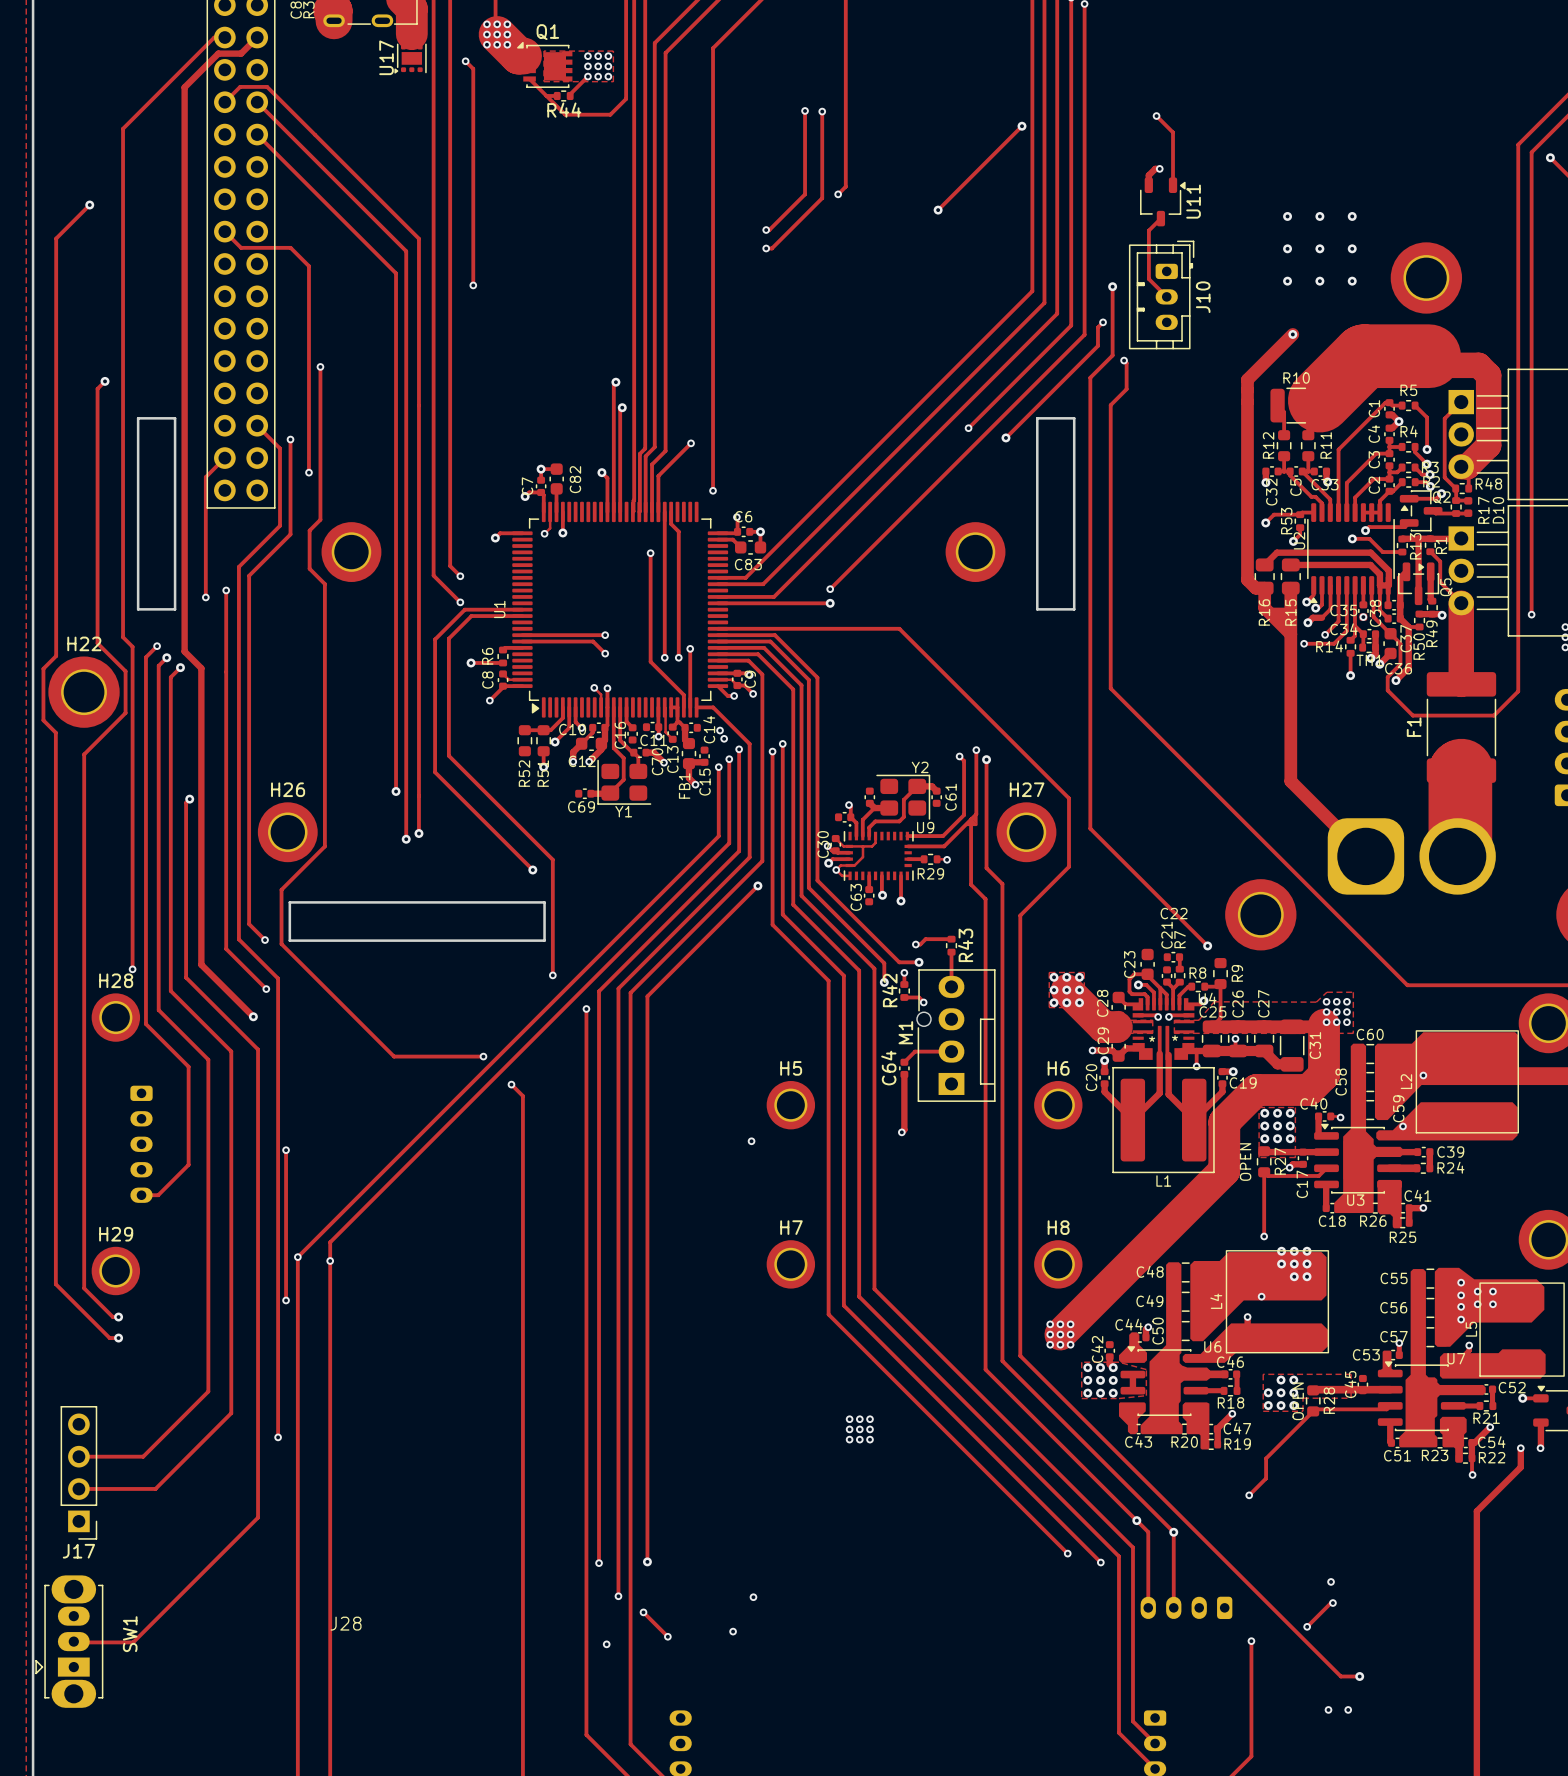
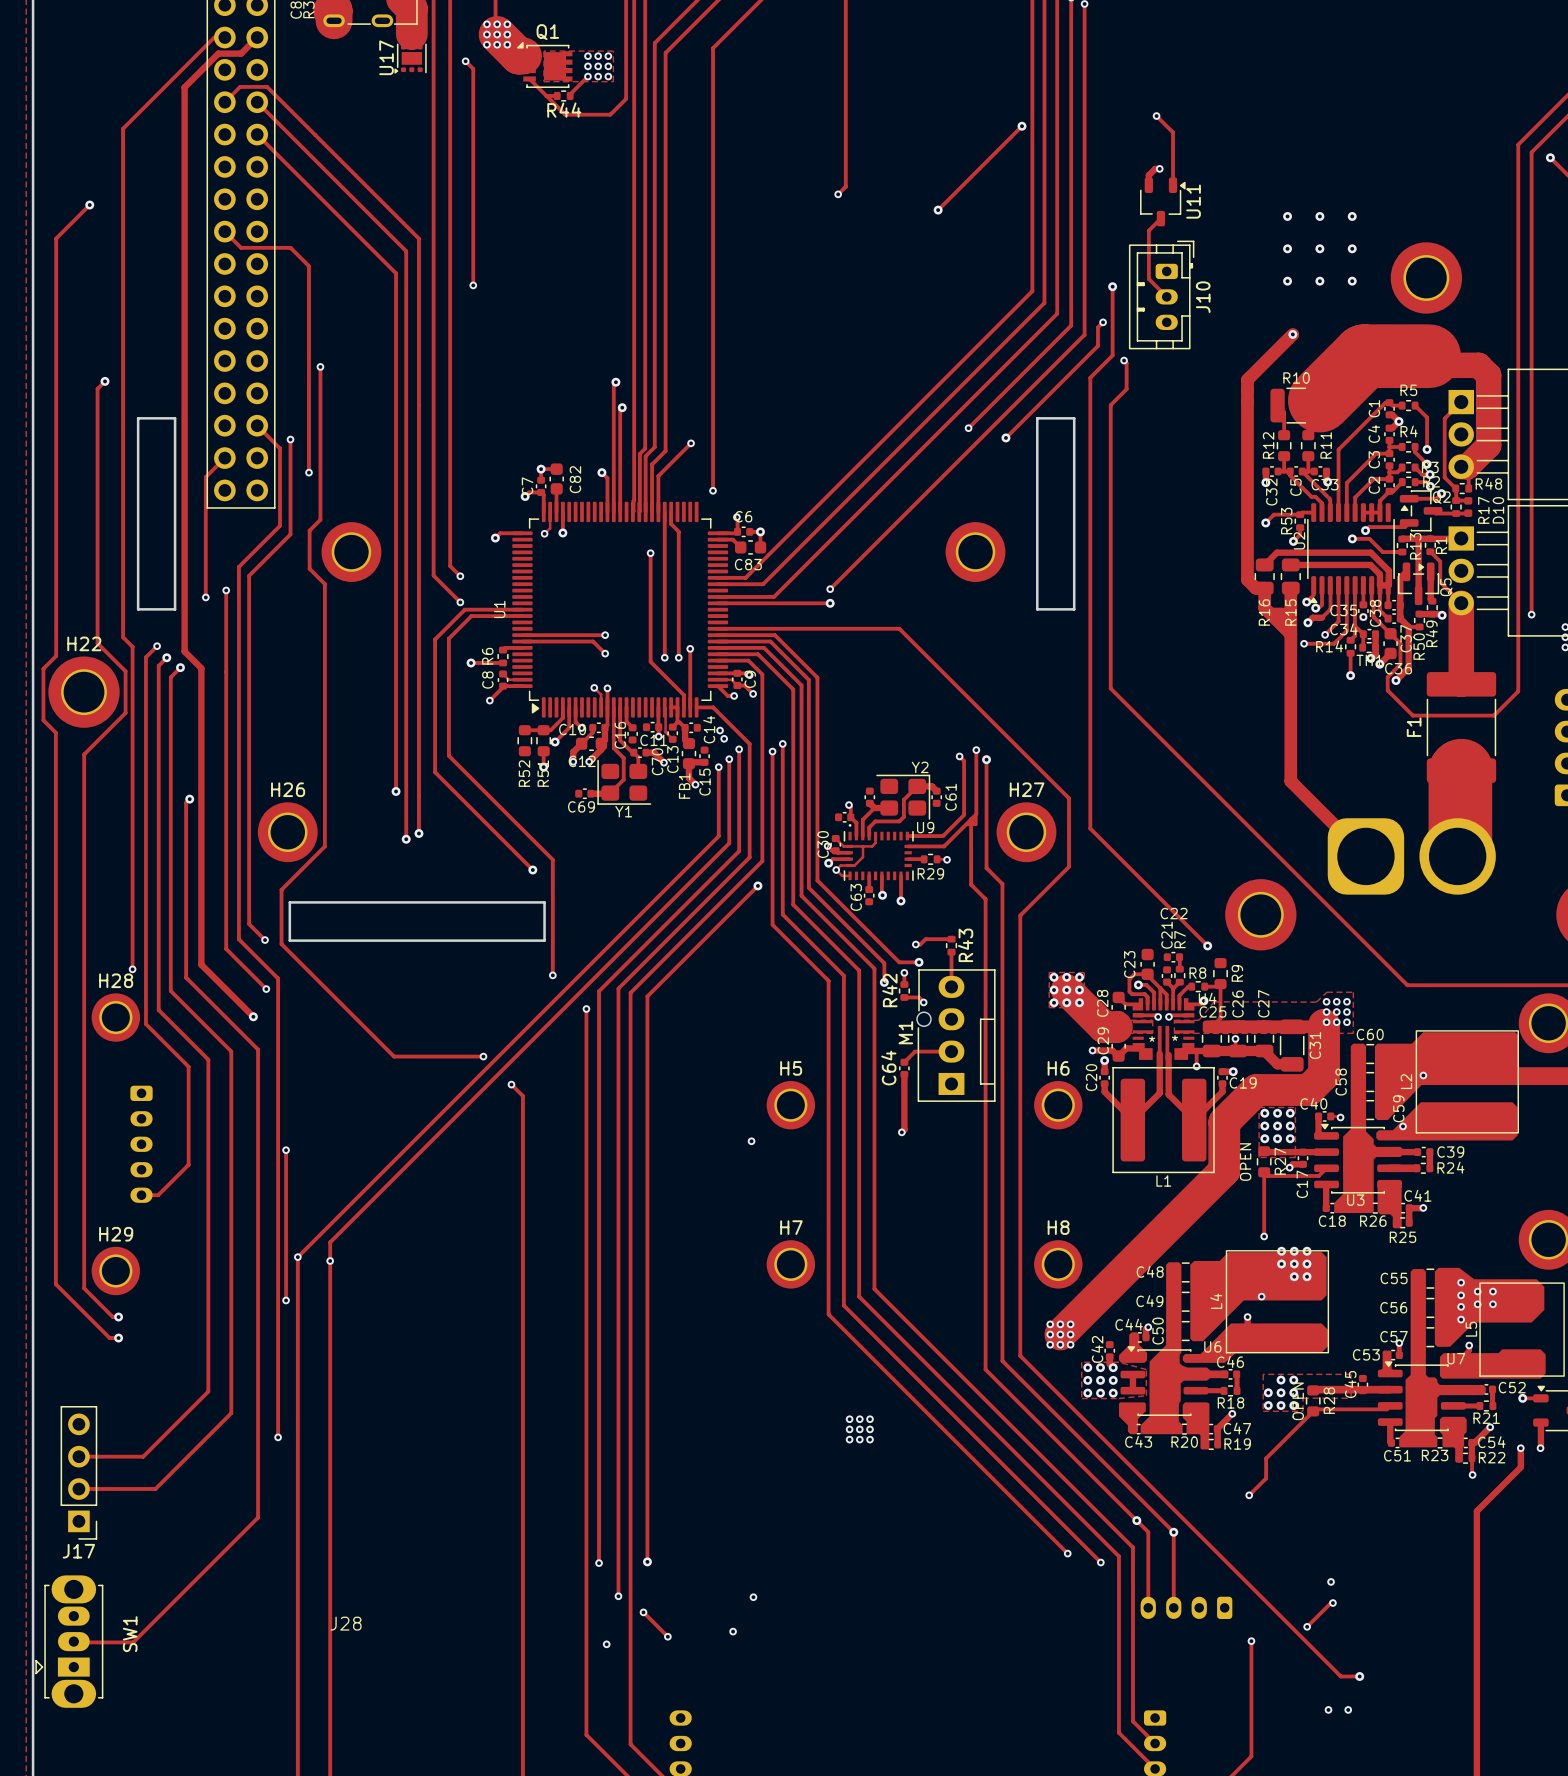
track: (805, 110) (805, 194) (769, 230) (766, 230) -> none
via: (805, 110) -> none
track: (822, 111) (822, 198) (771, 248) (766, 248) -> none
via: (822, 111) -> none
via: (766, 230) -> none
via: (766, 248) -> none

